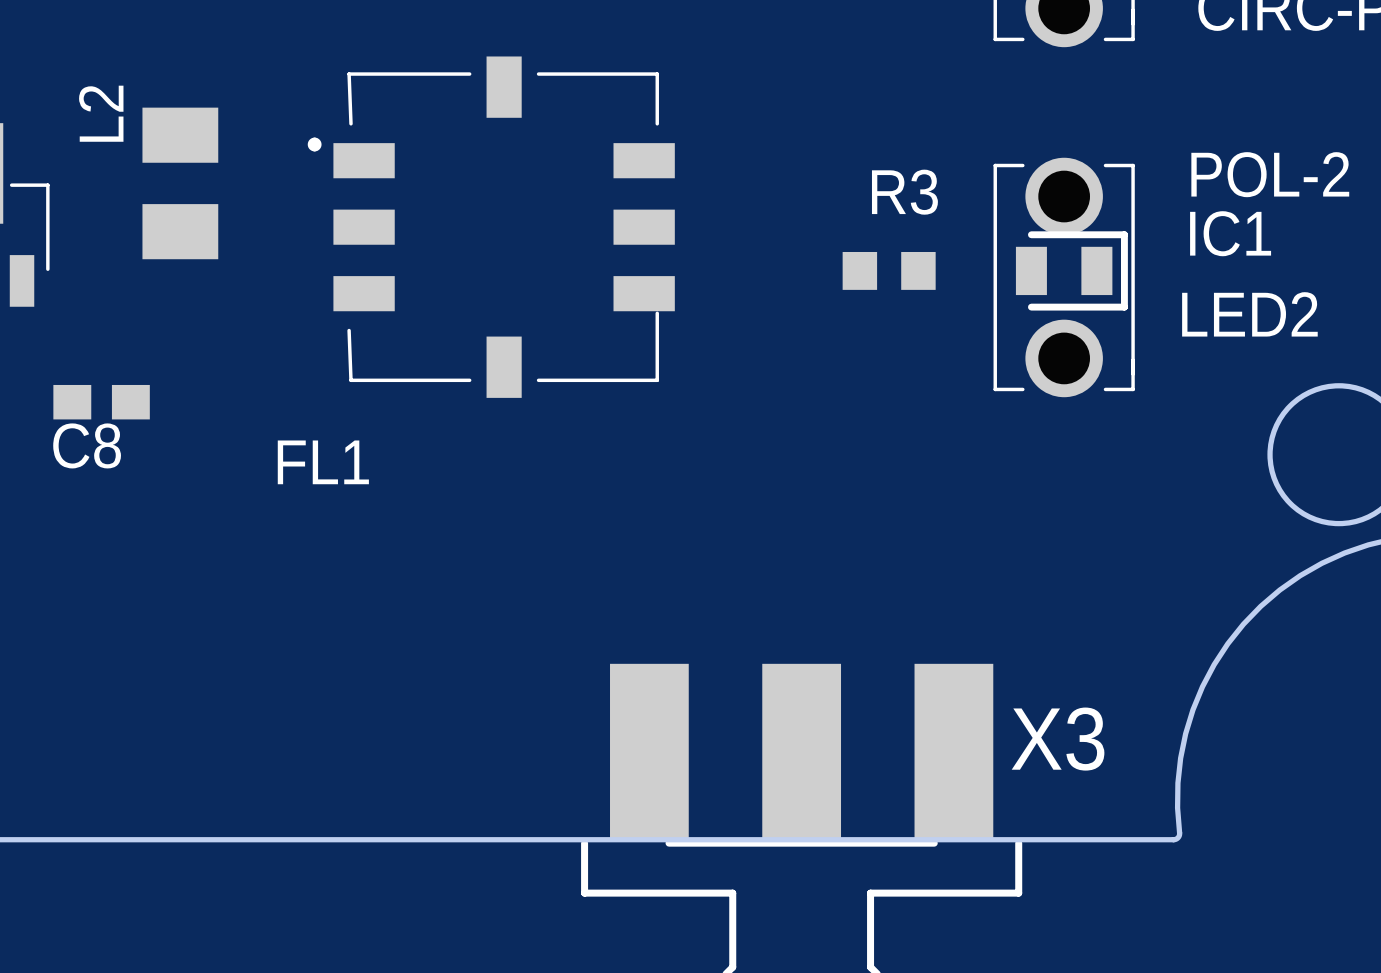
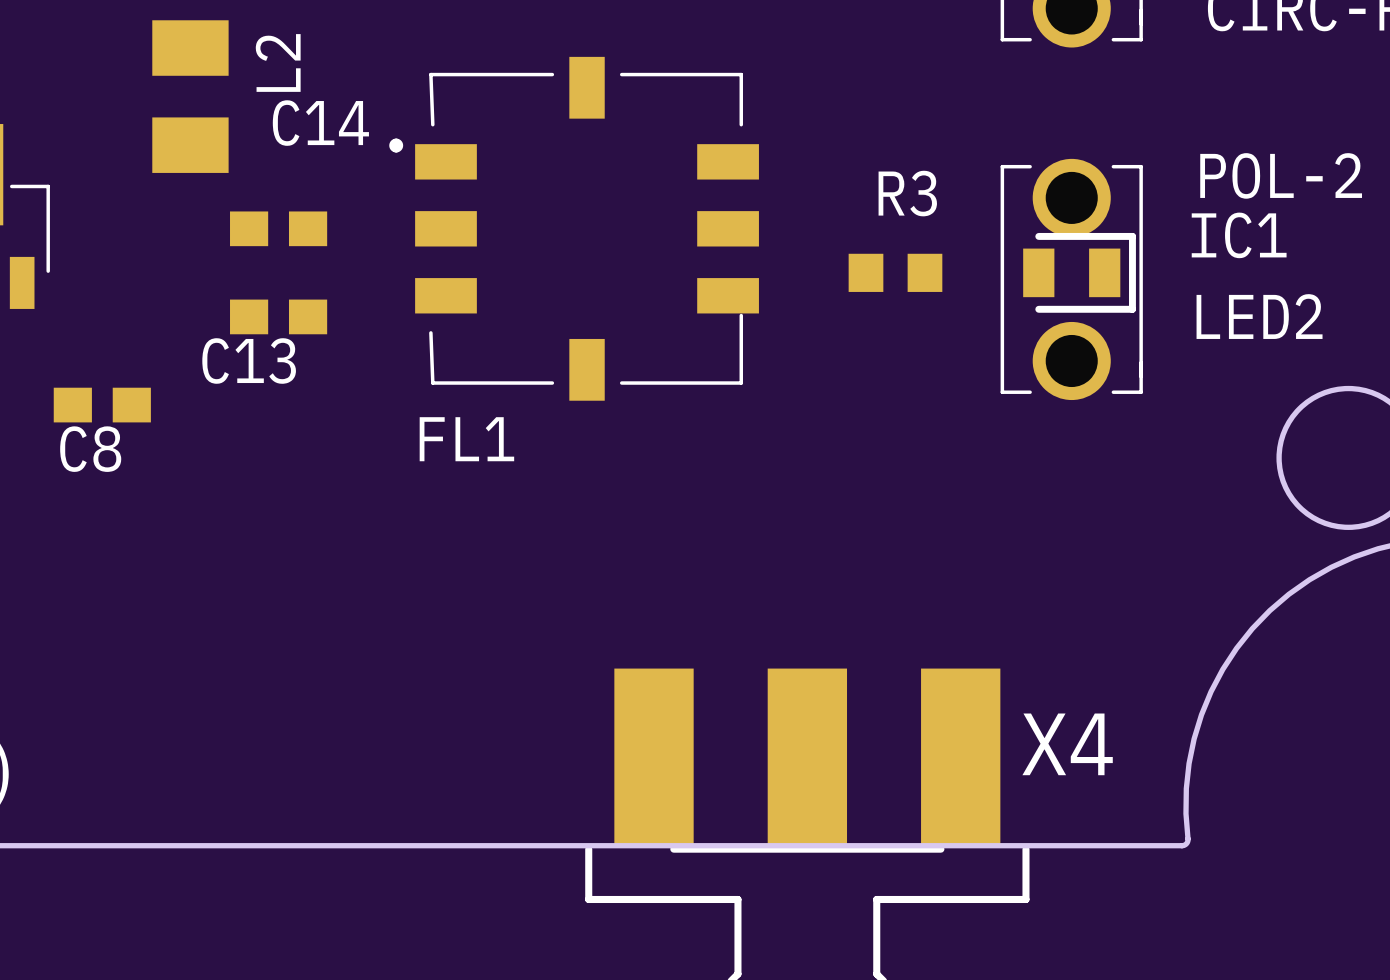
L2 name position: L2 (101, 113) -> L2 (278, 62)
L2 position: (180, 183) -> (190, 96)
C14: none -> (278, 228)
FL1 position: (491, 227) -> (574, 228)
C13: none -> (278, 316)
FL1 name position: FL1 (323, 462) -> FL1 (466, 439)
X3 name: X3 (1058, 739) -> X4 (1067, 744)

